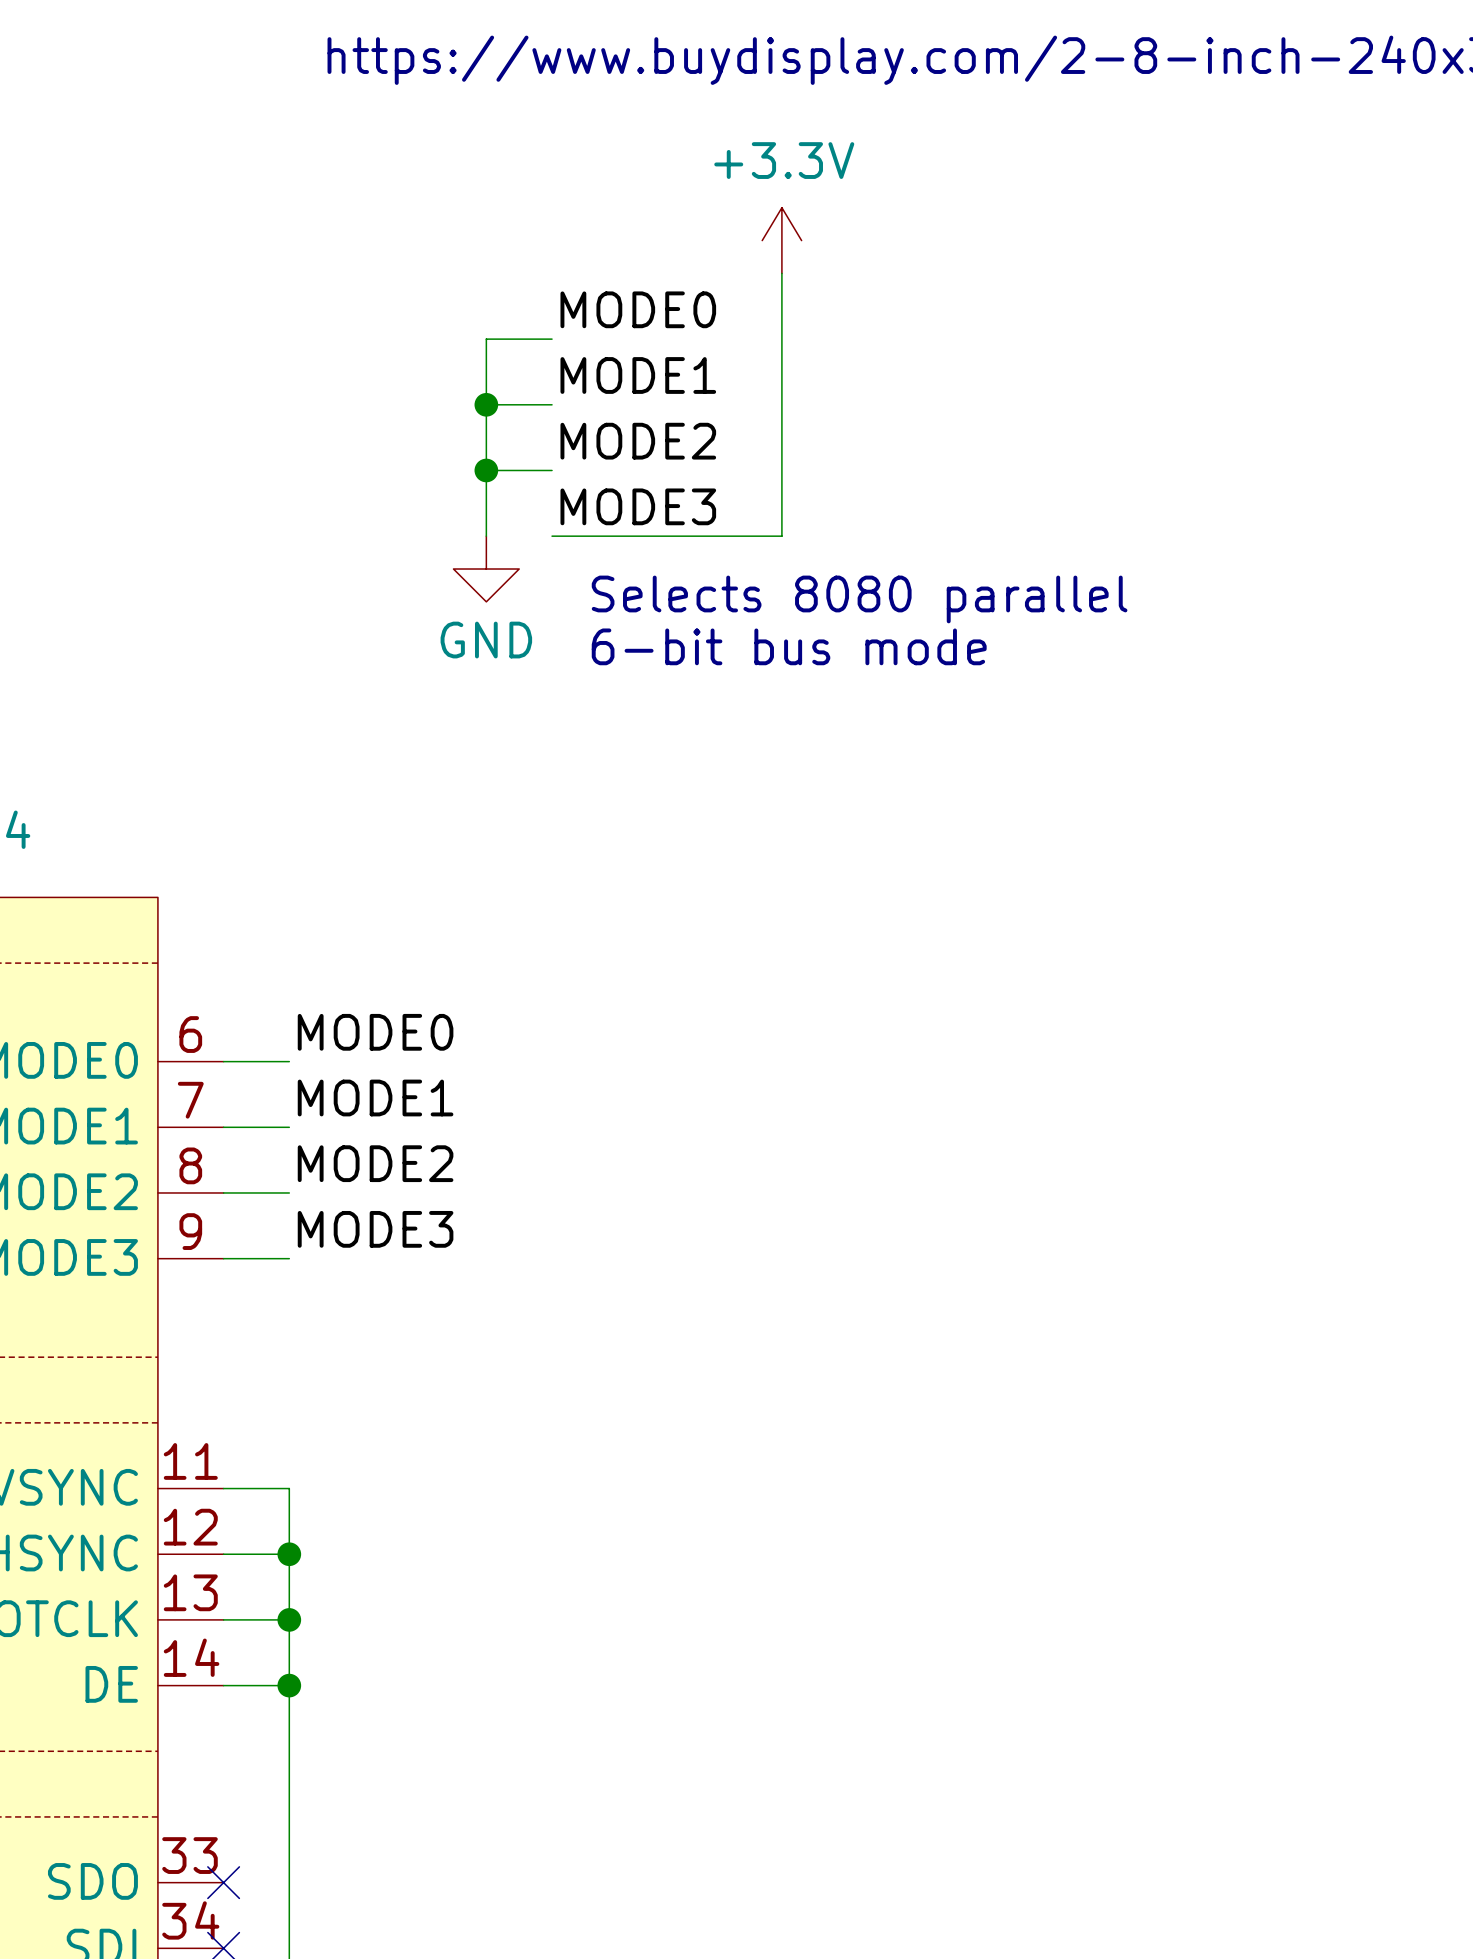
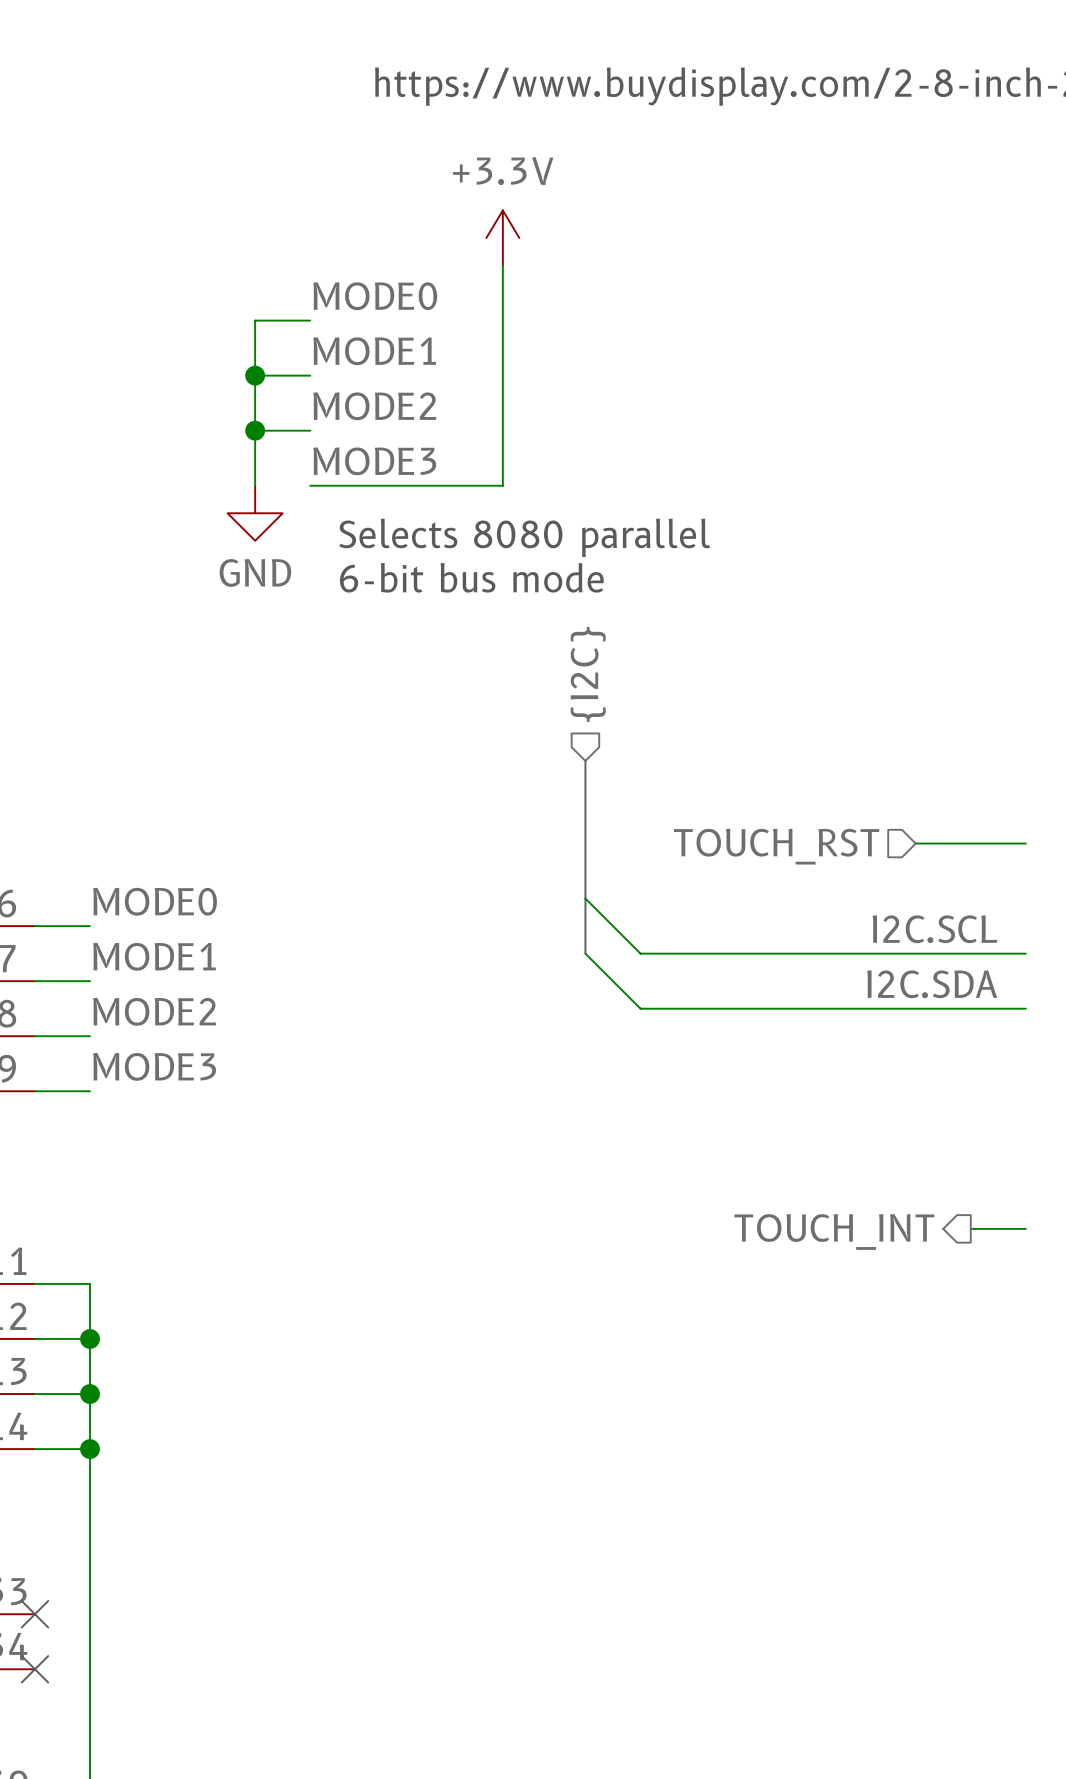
hierarchical label: none -> {I2C} (588, 674)
bus: none -> (585, 760) (585, 953)
hierarchical label: none -> TOUCH_RST (776, 846)
wire: none -> (915, 843) (1025, 843)
wire: none -> (585, 898) (640, 953) (1025, 953)
label: none -> I2C.SCL (934, 929)
wire: none -> (585, 953) (640, 1008) (1025, 1008)
label: none -> I2C.SDA (932, 984)
wire: none -> (970, 1228) (1025, 1228)
hierarchical label: none -> TOUCH_INT (834, 1231)

